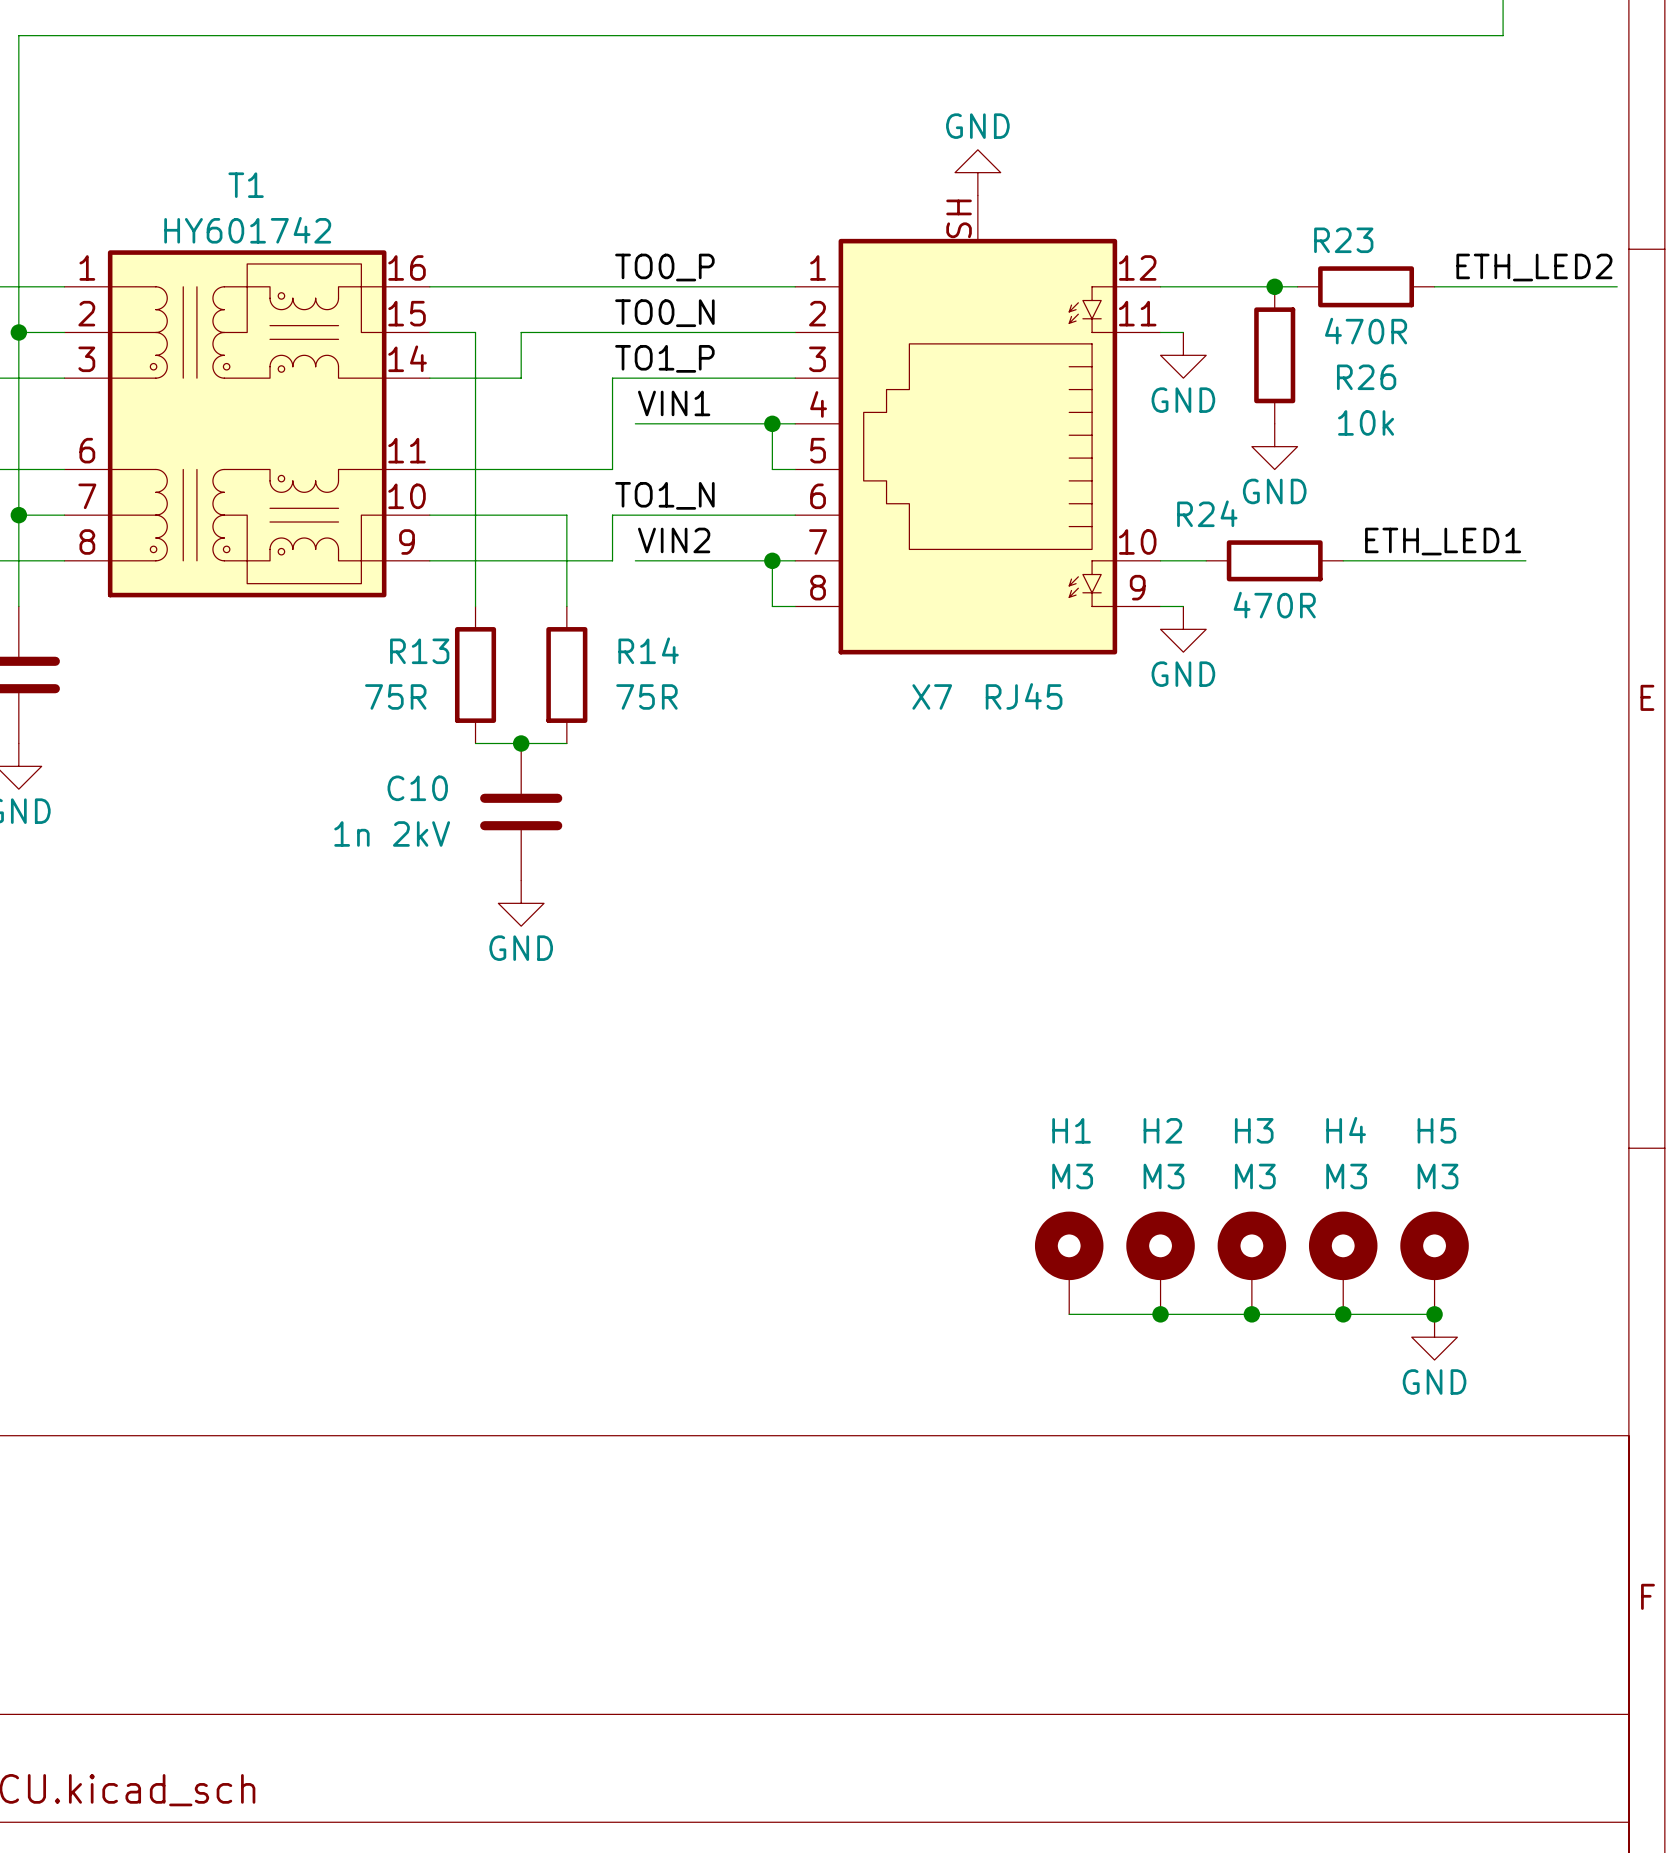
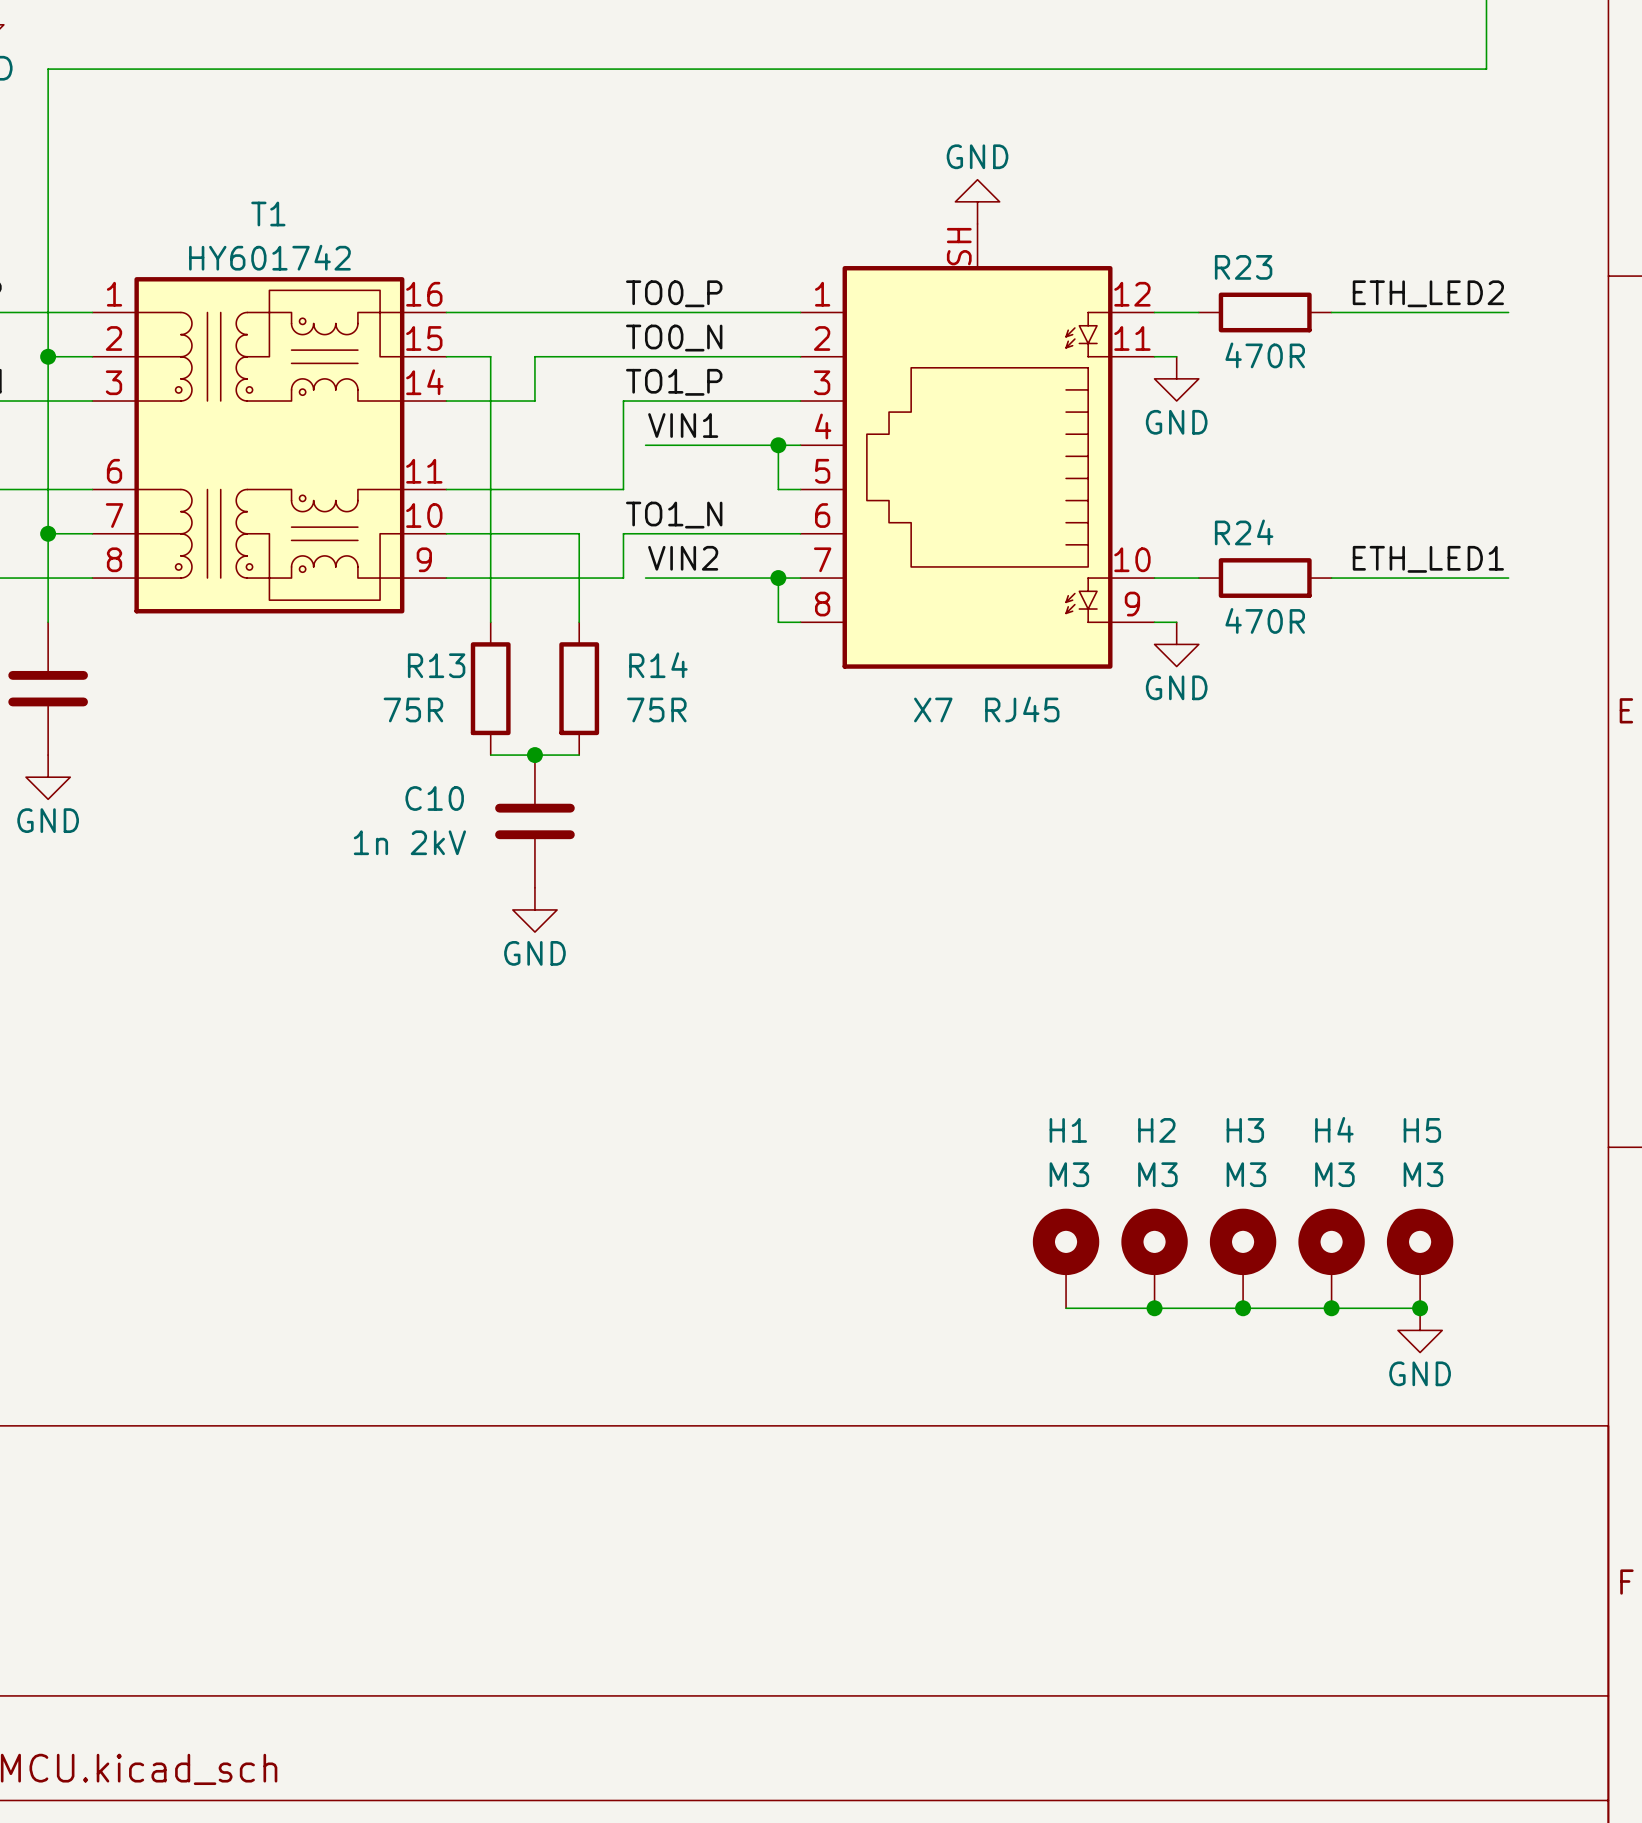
label position: ETH_LED2 (1534, 267) -> ETH_LED2 (1428, 293)
wire: (1206, 286) (1297, 286) -> (1331, 312) (1420, 312)
junction: (1274, 286) -> none
R23 position: (1366, 286) -> (1265, 312)
wire: (1525, 286) (1617, 286) -> none
R26: 10k (1274, 355) -> none
power symbol: GND (1274, 446) -> none
R24 name position: R24 (1207, 513) -> R24 (1244, 532)

